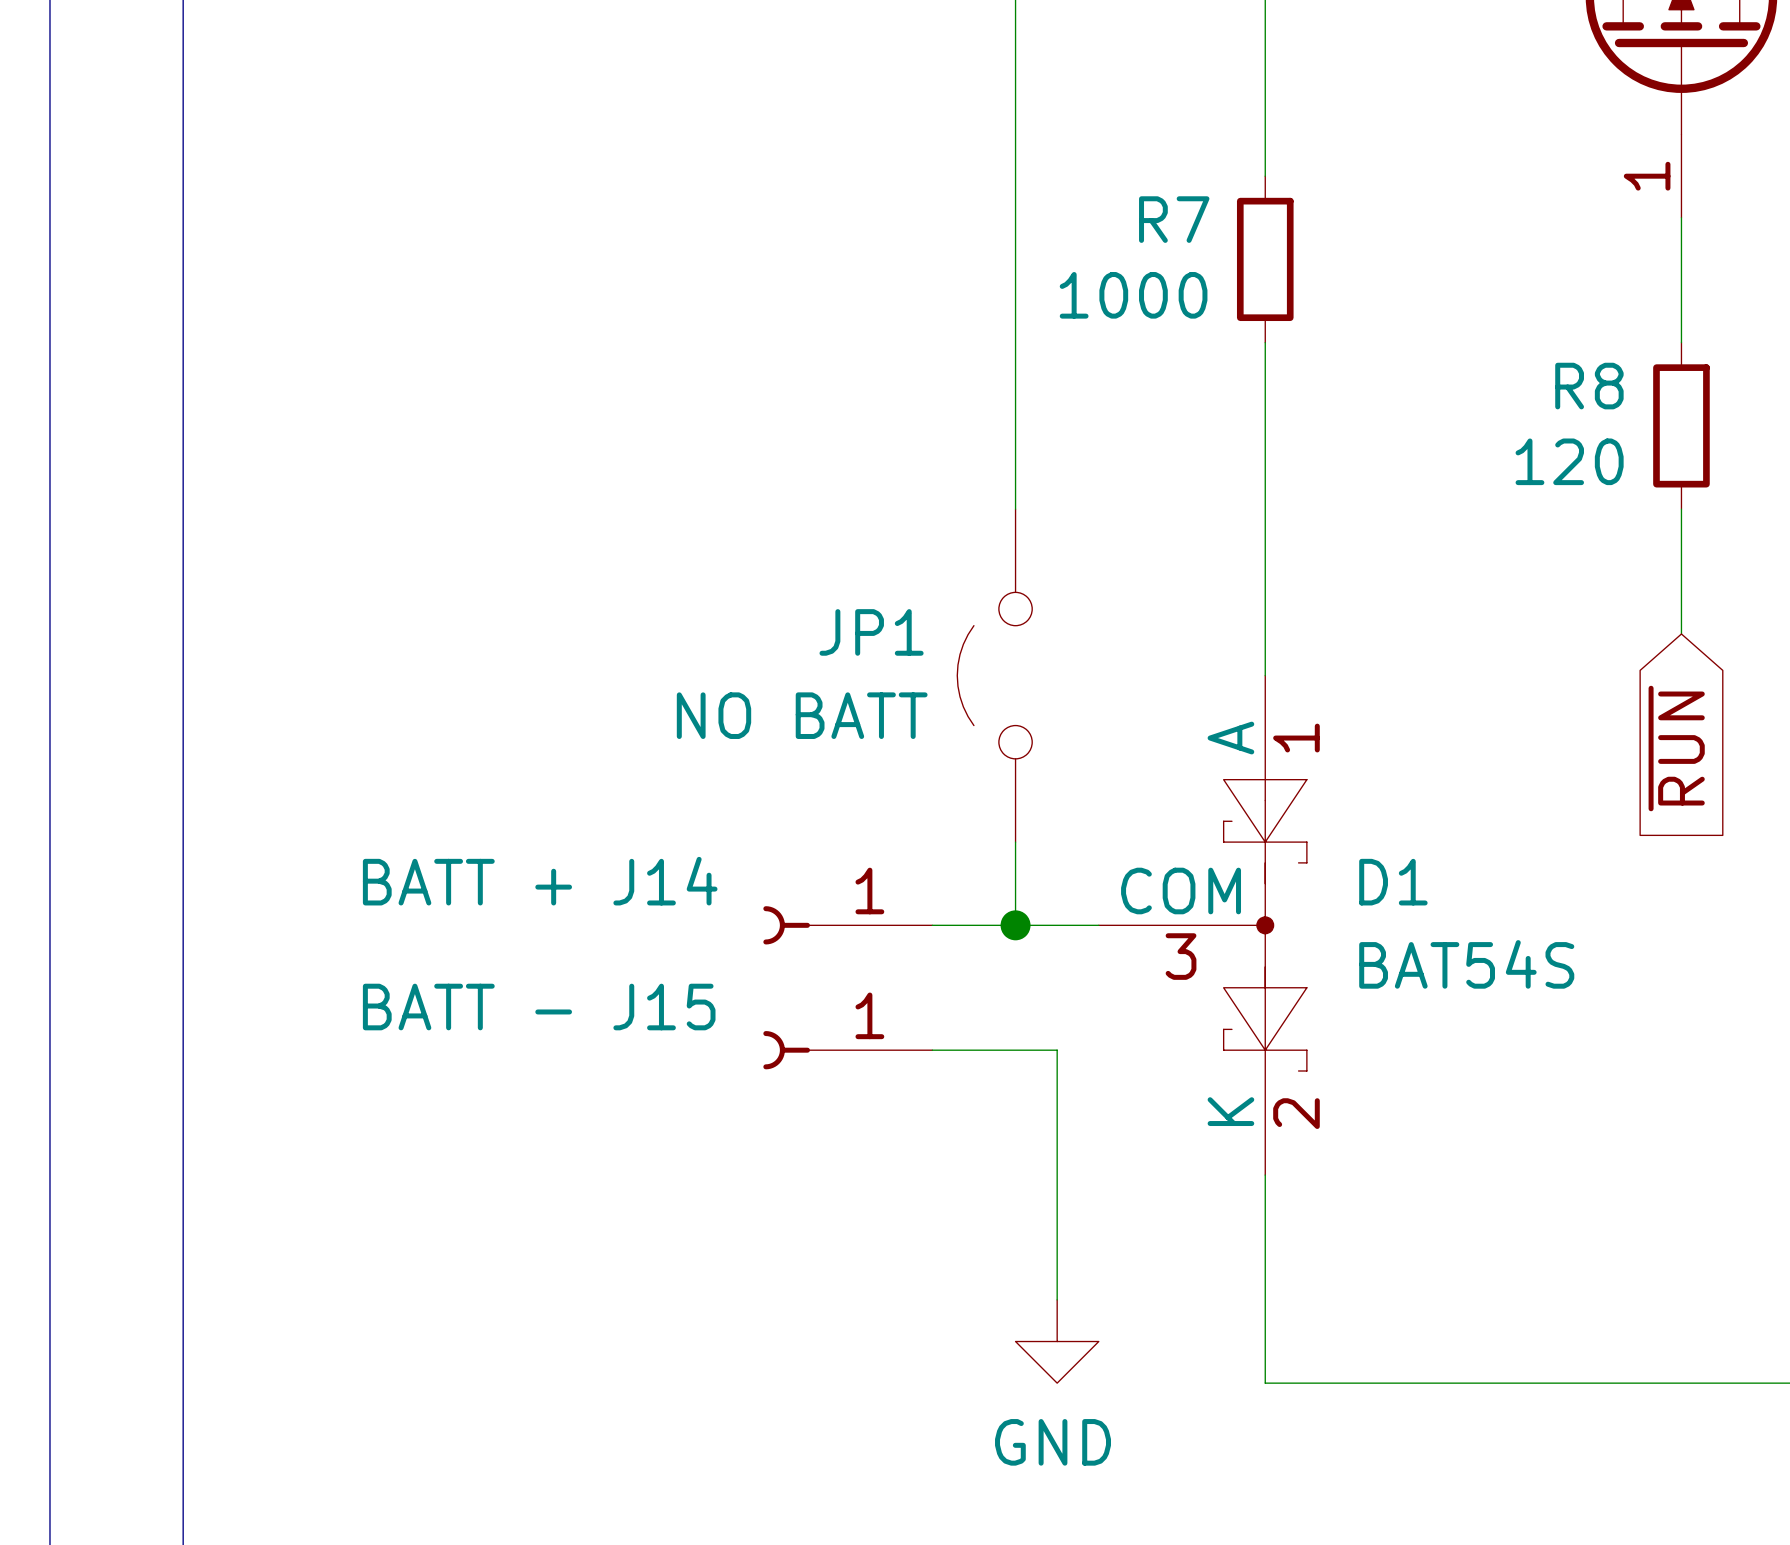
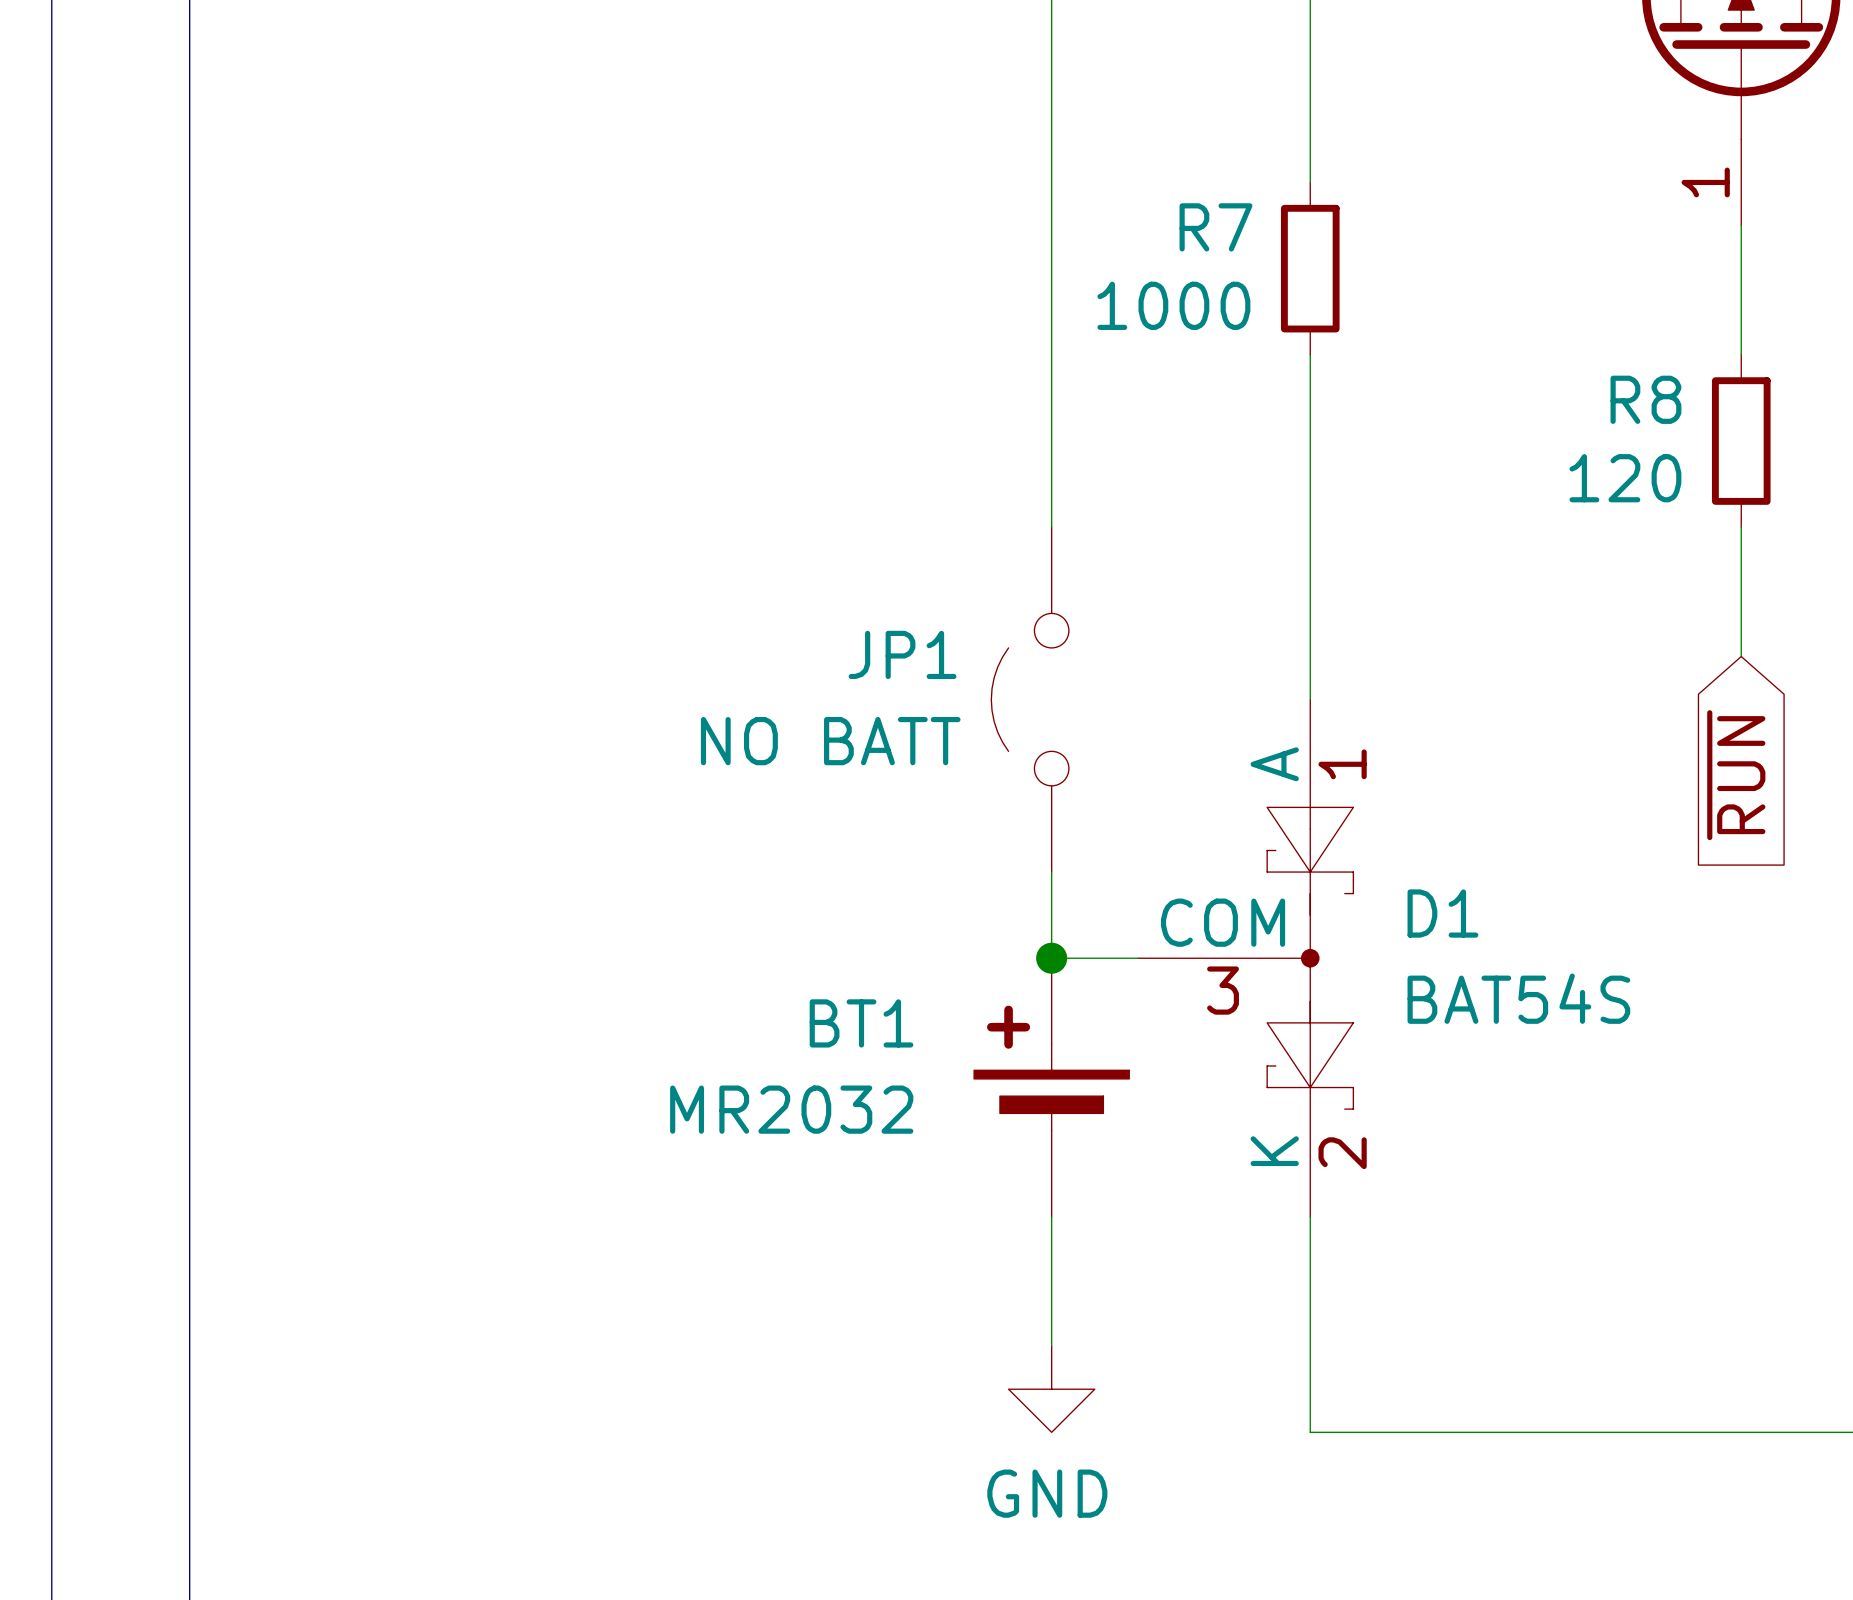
J14: BATT + (847, 925) -> none
wire: (932, 925) (1015, 925) -> none
J15: BATT - (847, 1050) -> none
wire: (932, 1050) (1057, 1050) (1057, 1299) -> none
BT1: none -> MR2032 (1051, 1087)
wire: none -> (1051, 1216) (1051, 1346)
power symbol position: GND (1057, 1341) -> GND (1051, 1389)

